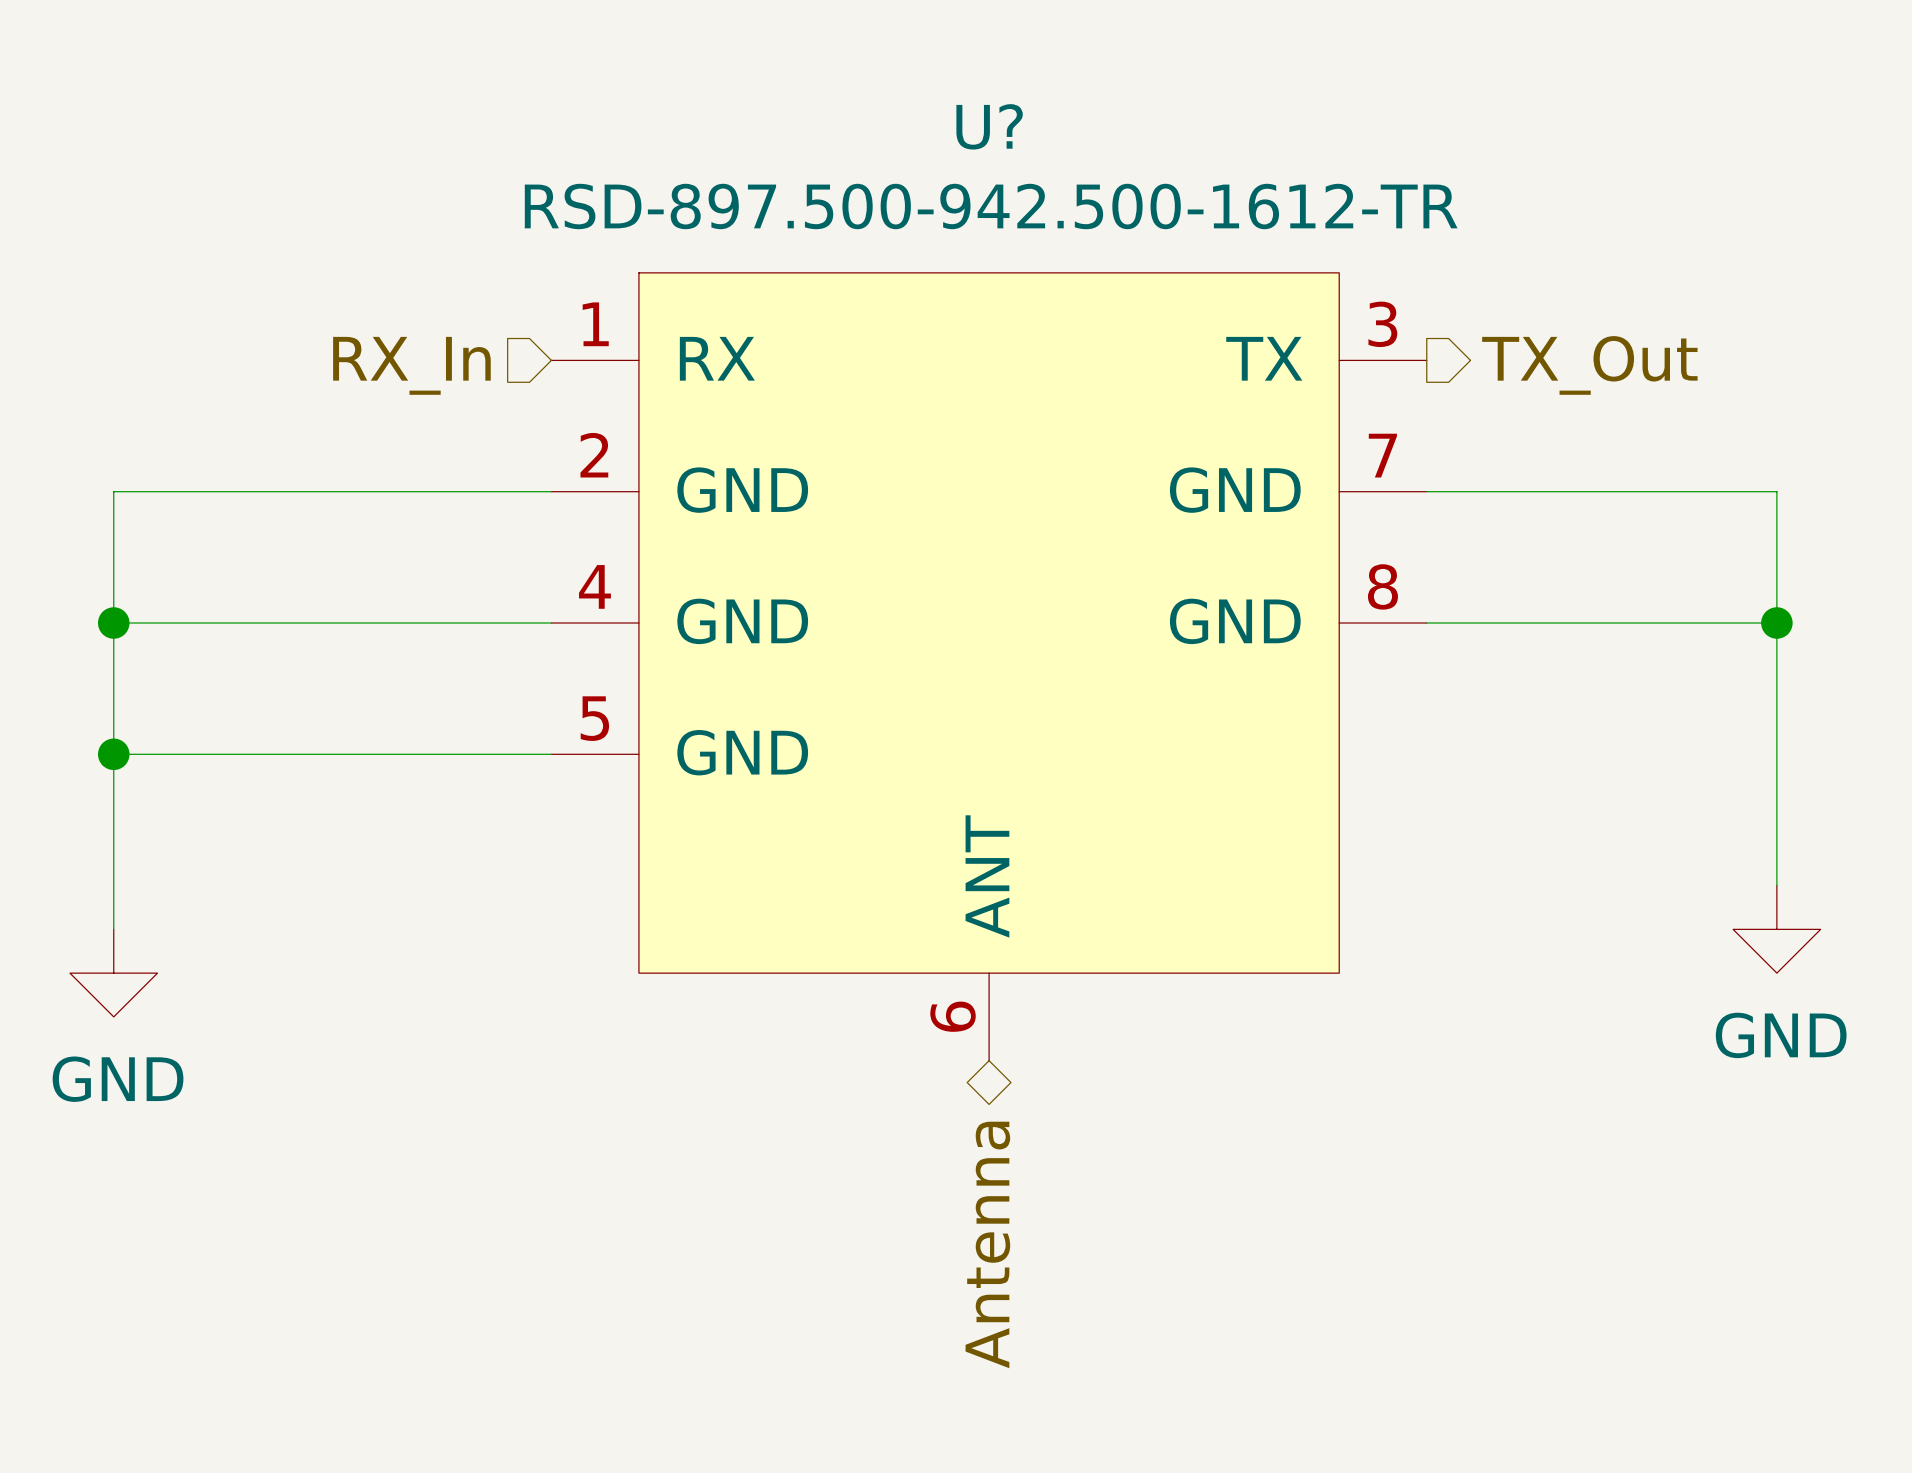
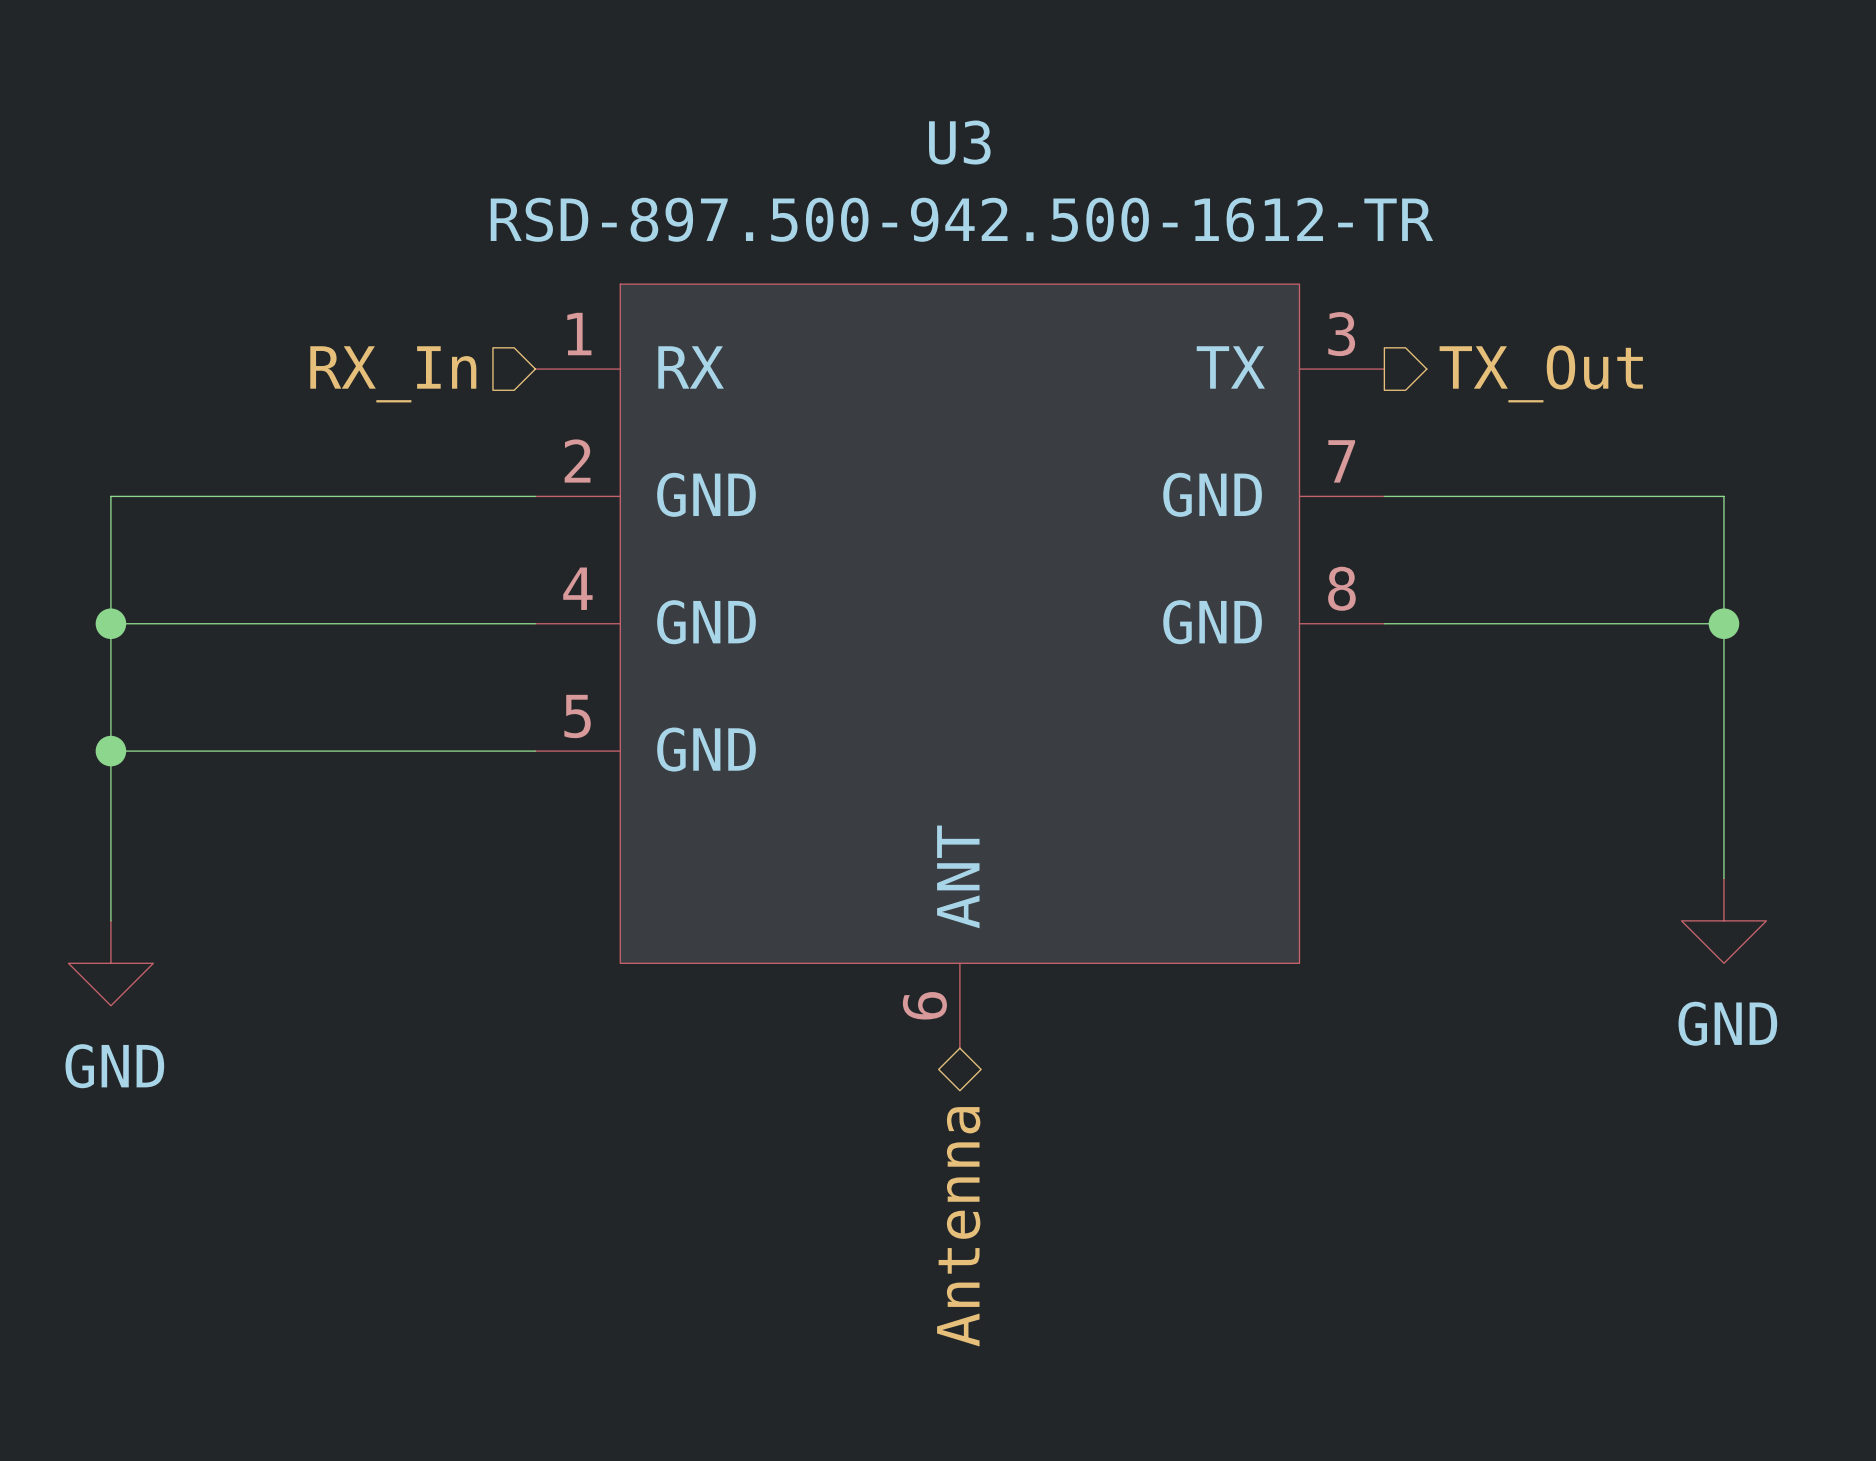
U? name: U? (989, 126) -> U3 (959, 142)

